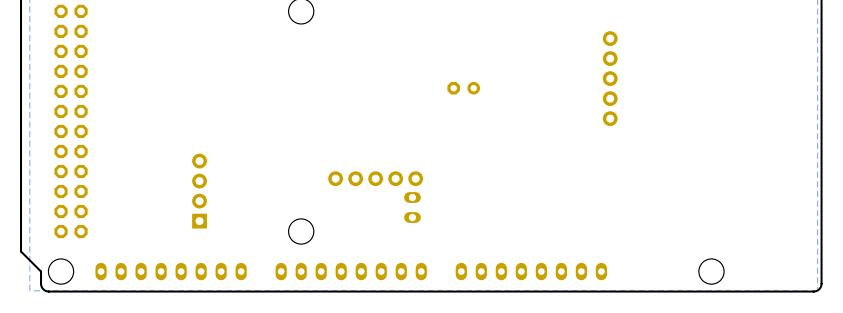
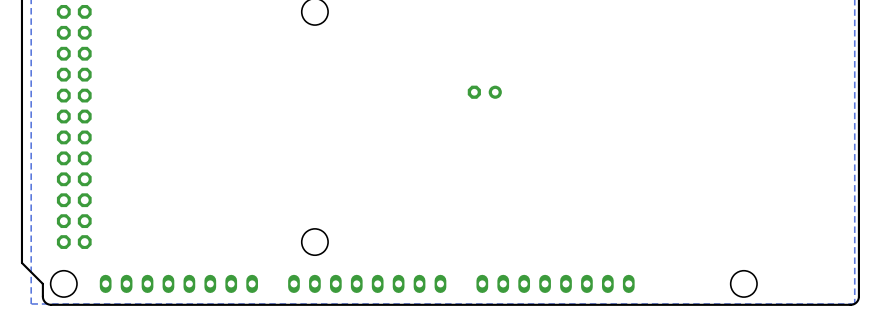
part: (610, 78) -> none
part: (375, 178) -> none
part: (199, 191) -> none
part: (412, 207) -> none

